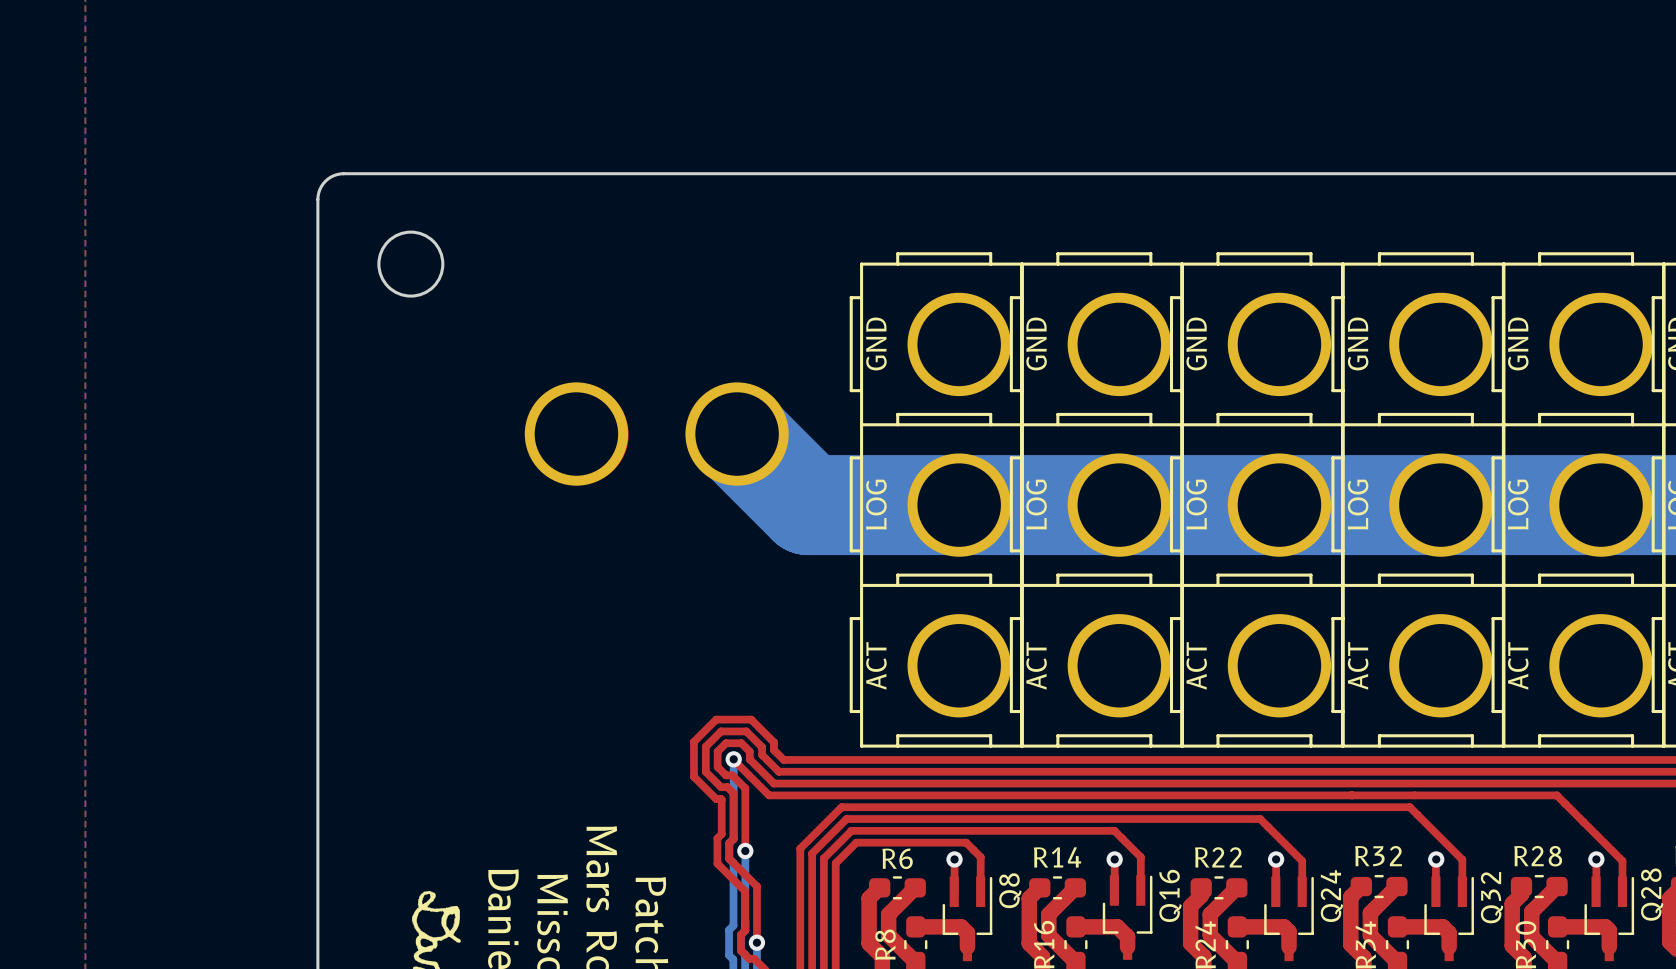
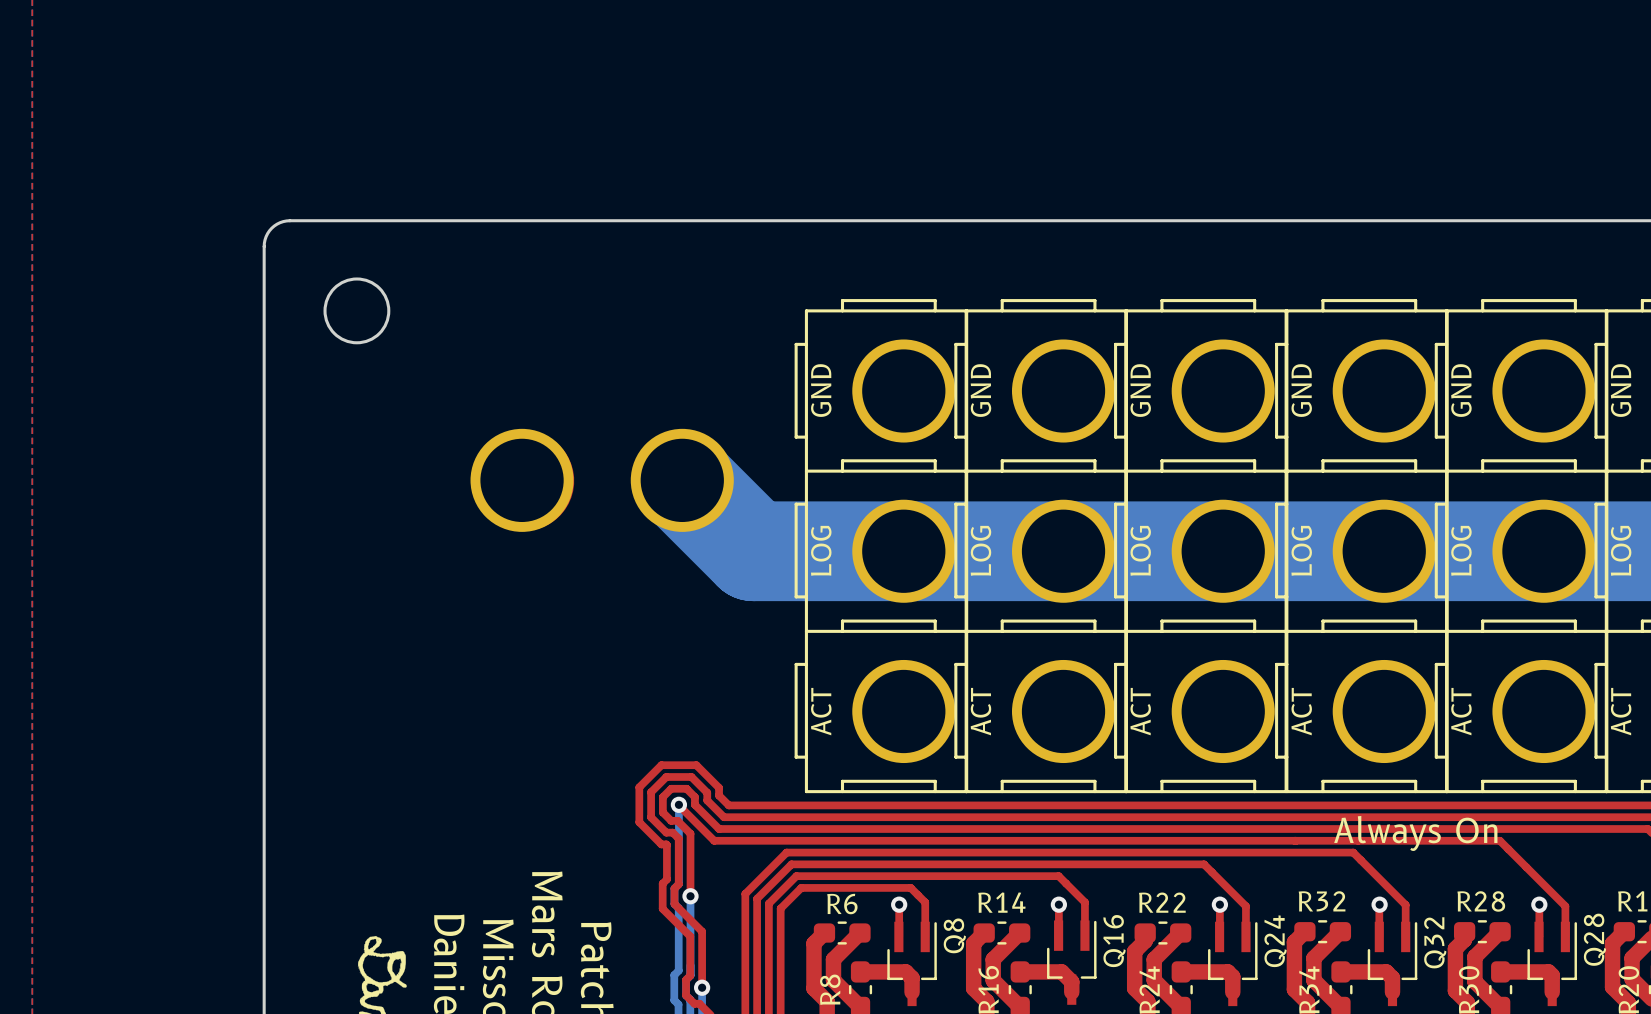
text: none -> Always On (1415, 833)

